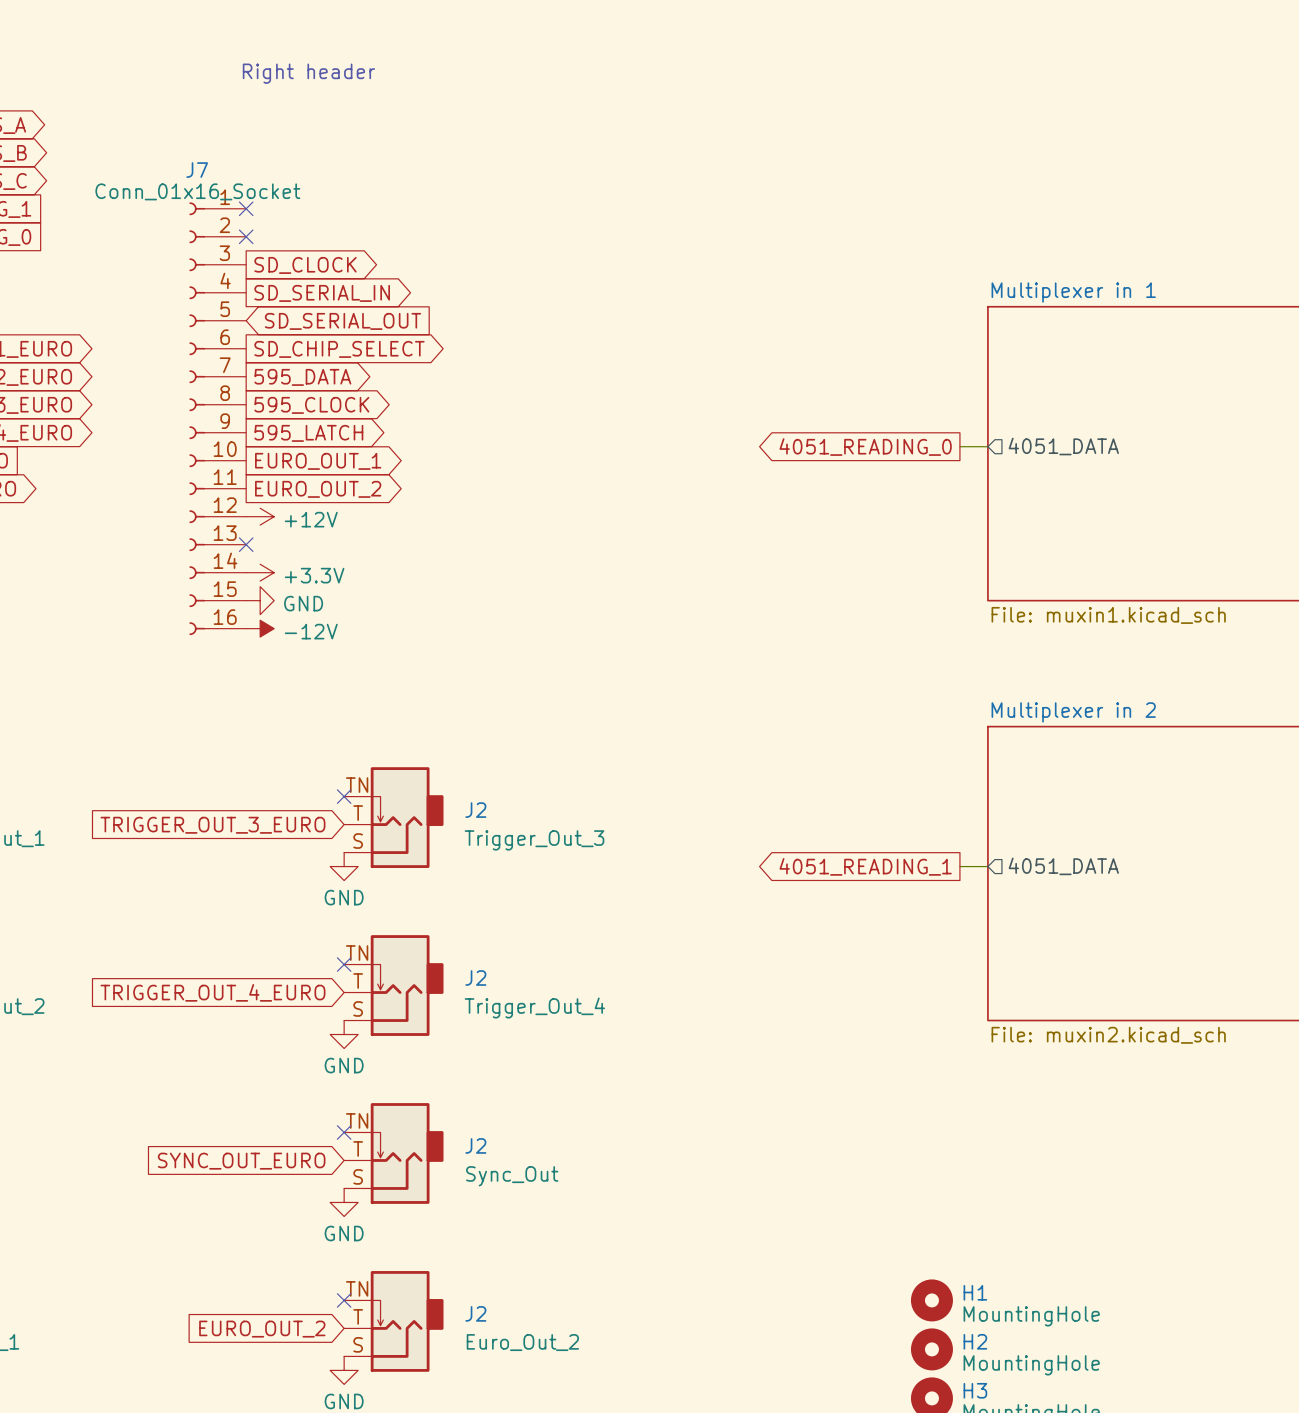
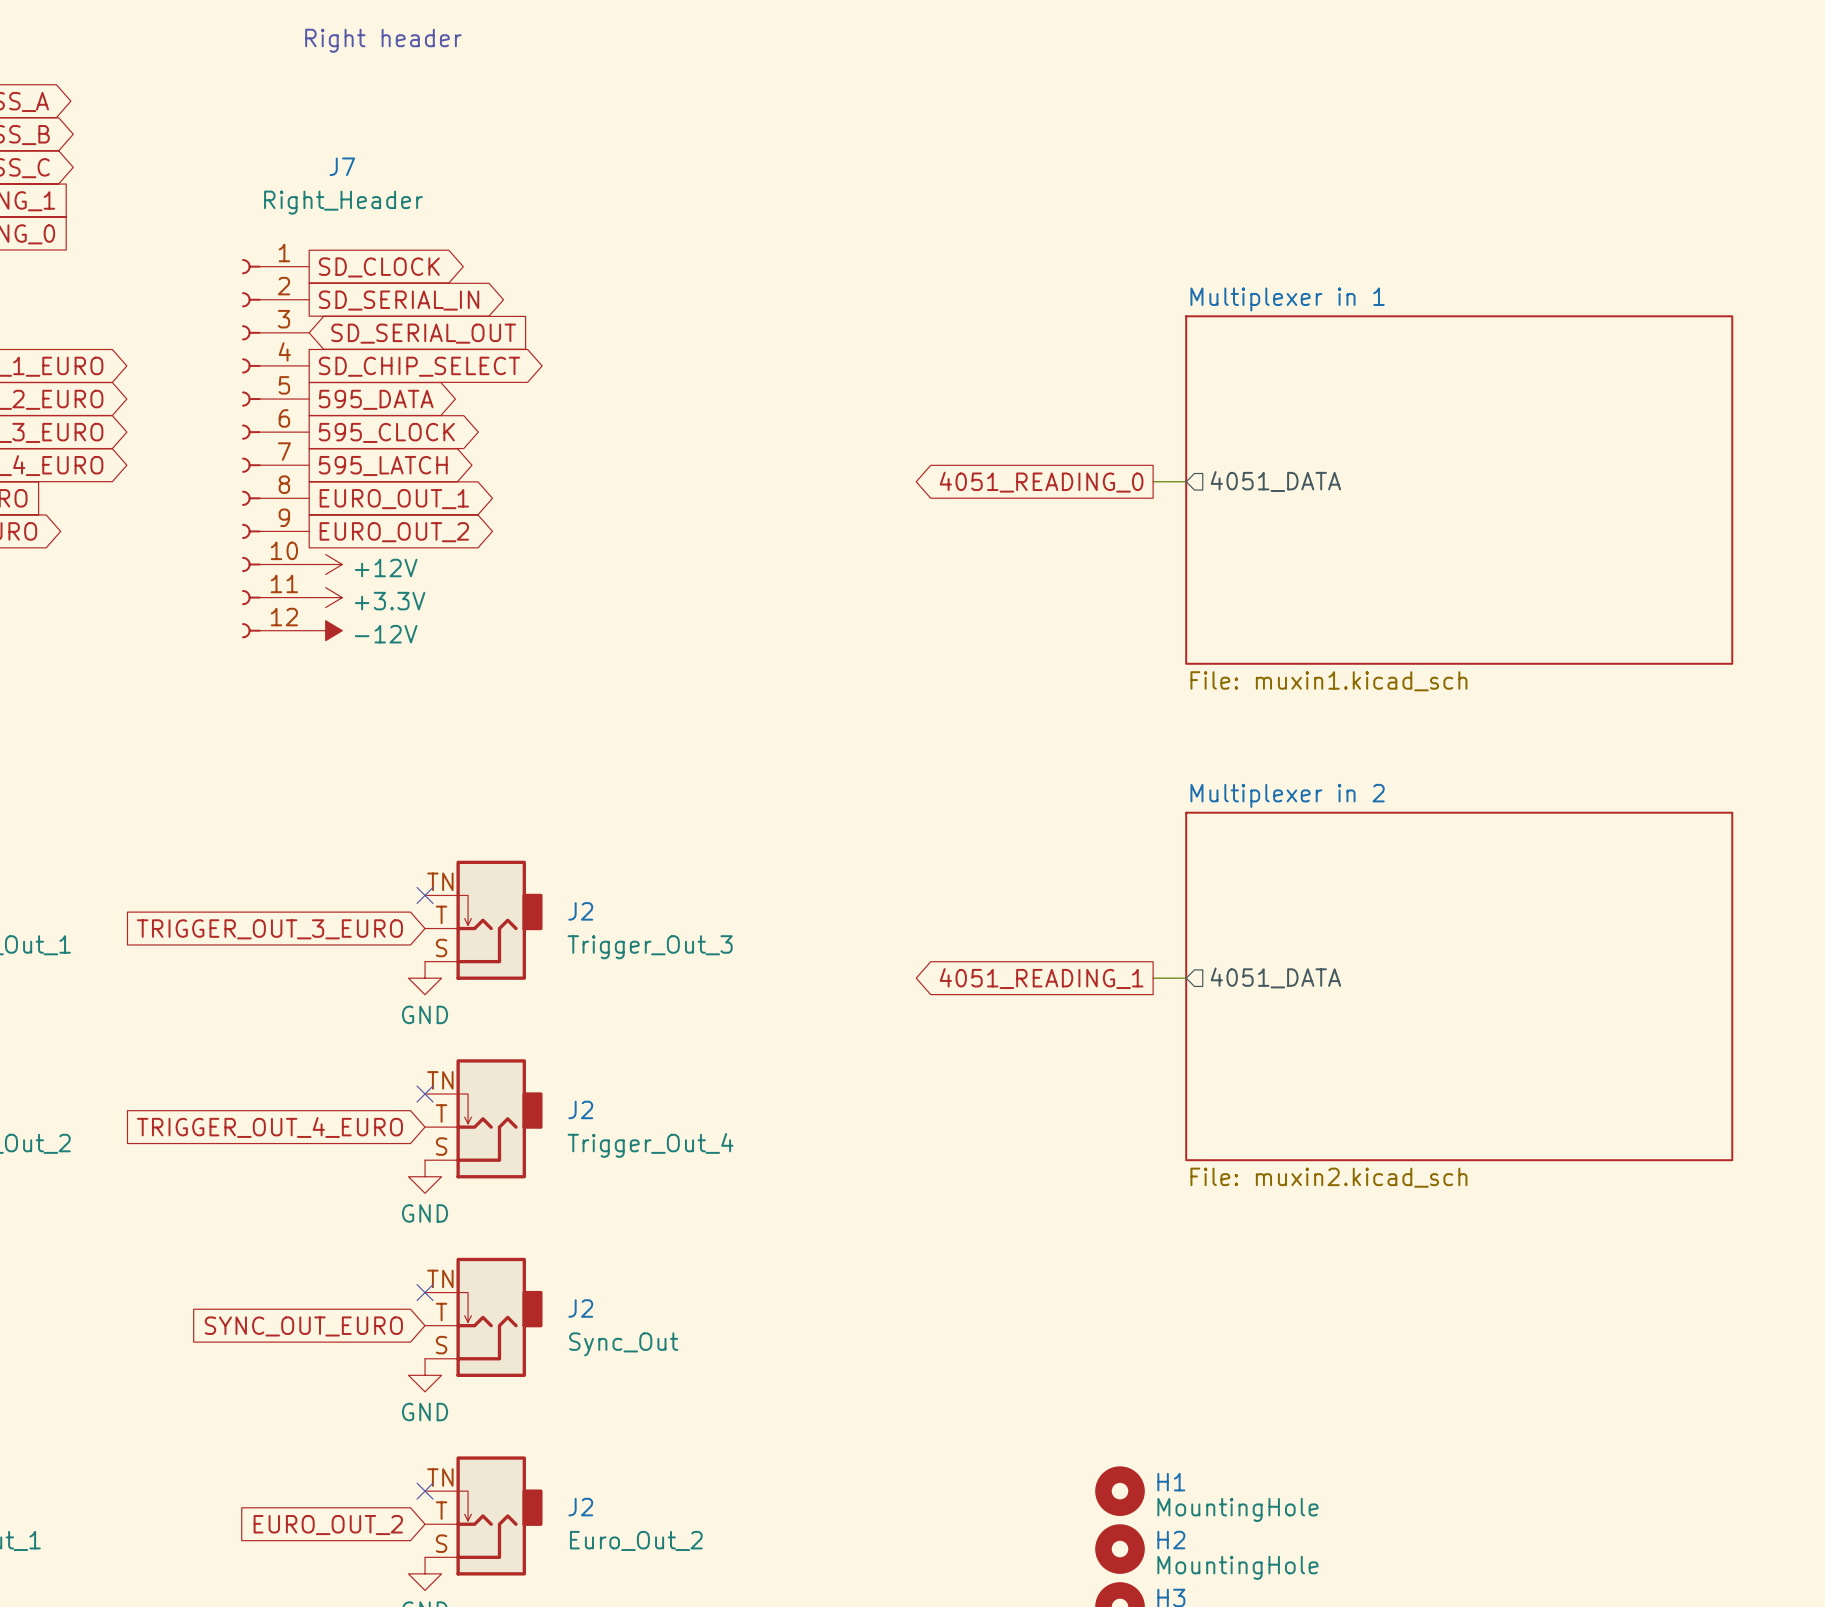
J7 name position: J7 (197, 170) -> J7 (342, 166)
J7 value: Conn_01x16_Socket (197, 191) -> Right_Header (343, 202)
J7 symbol: [189, 202, 247, 636] -> [242, 259, 310, 639]
no-connect mark: (246, 208) -> none
no-connect mark: (246, 236) -> none
no-connect mark: (246, 544) -> none
power symbol: none -> +3.3V (325, 597)
power symbol: +3.3V (260, 572) -> -12V (325, 630)
power symbol: GND (260, 600) -> none
power symbol: -12V (260, 628) -> none

